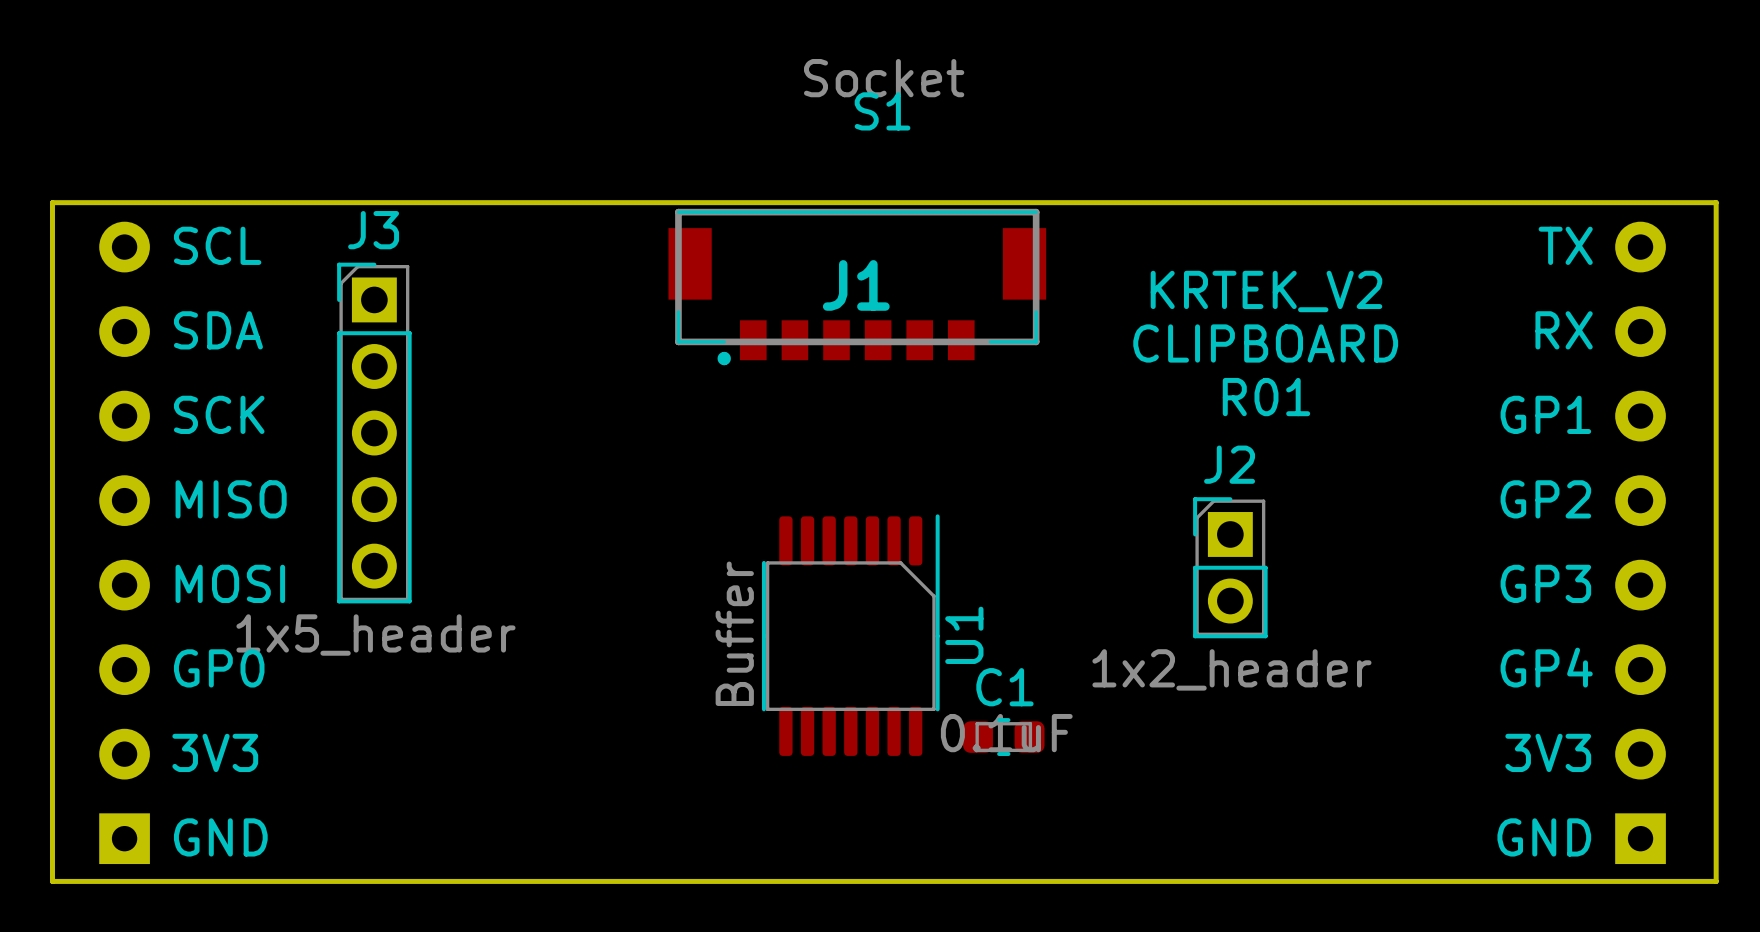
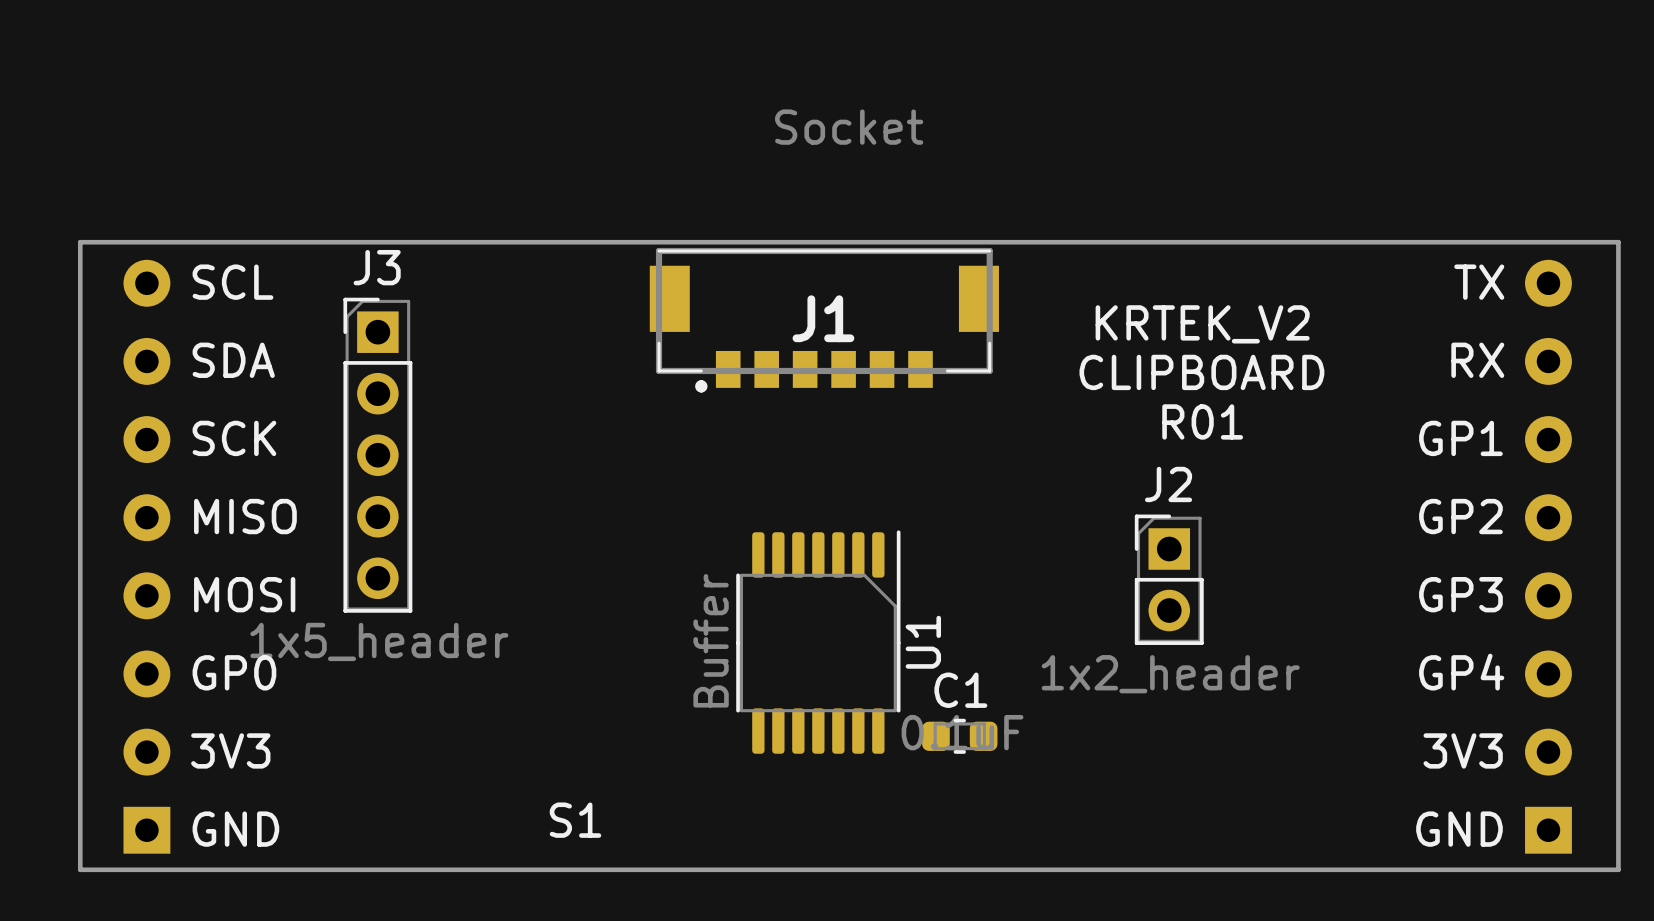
S1 name position: S1 (882, 111) -> S1 (575, 820)

